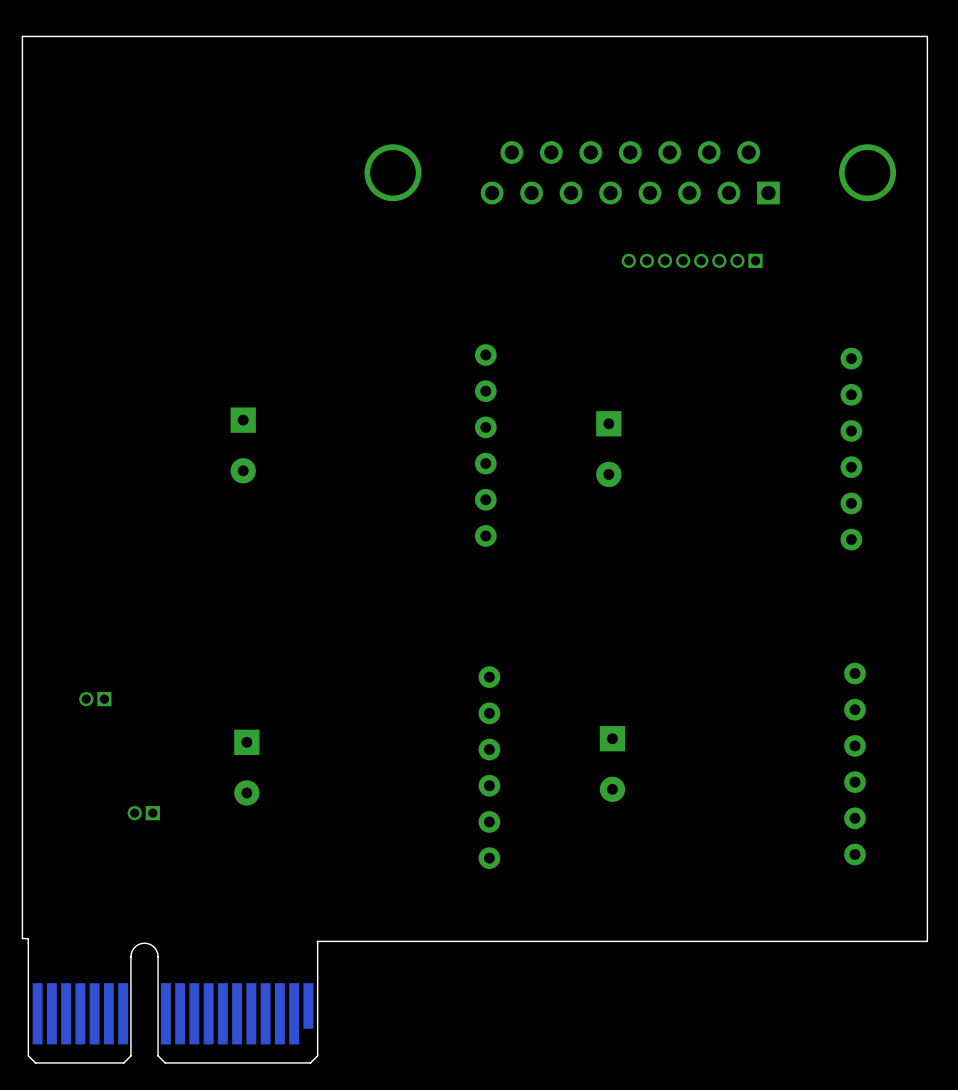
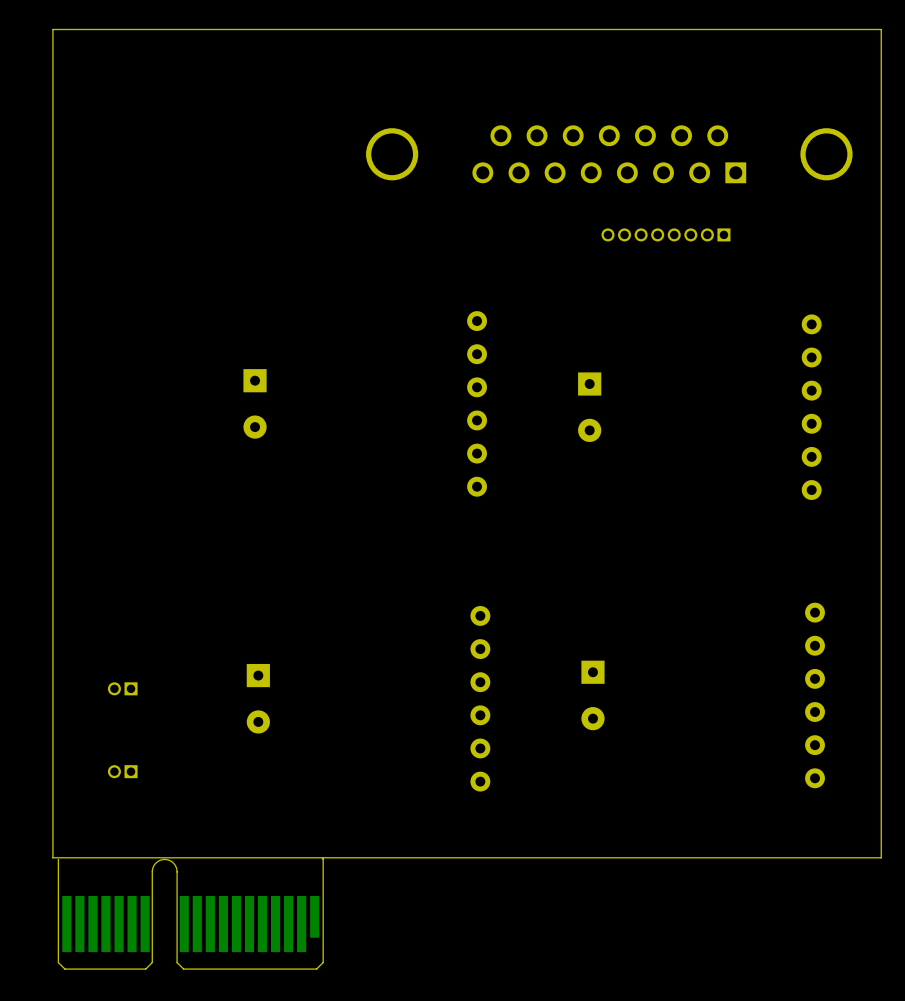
part: (95, 699) -> none
part: none -> (122, 688)
part: (143, 813) -> none
part: none -> (122, 771)
board edge: (22, 938) (28, 938) (28, 943) -> (52, 855) (52, 857) (322, 857)

